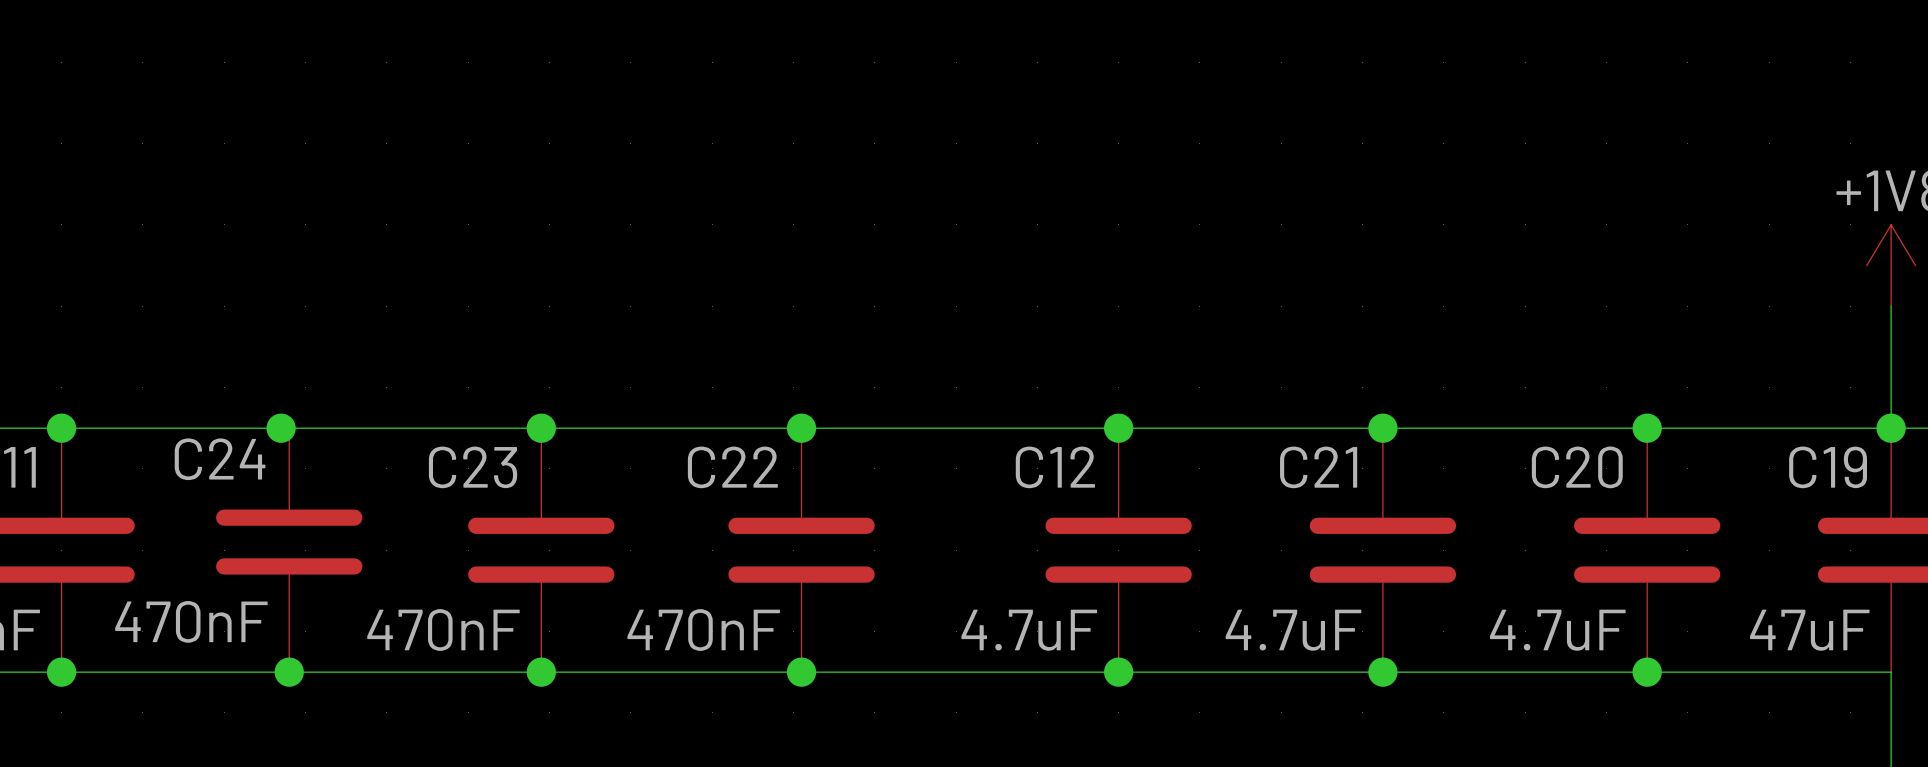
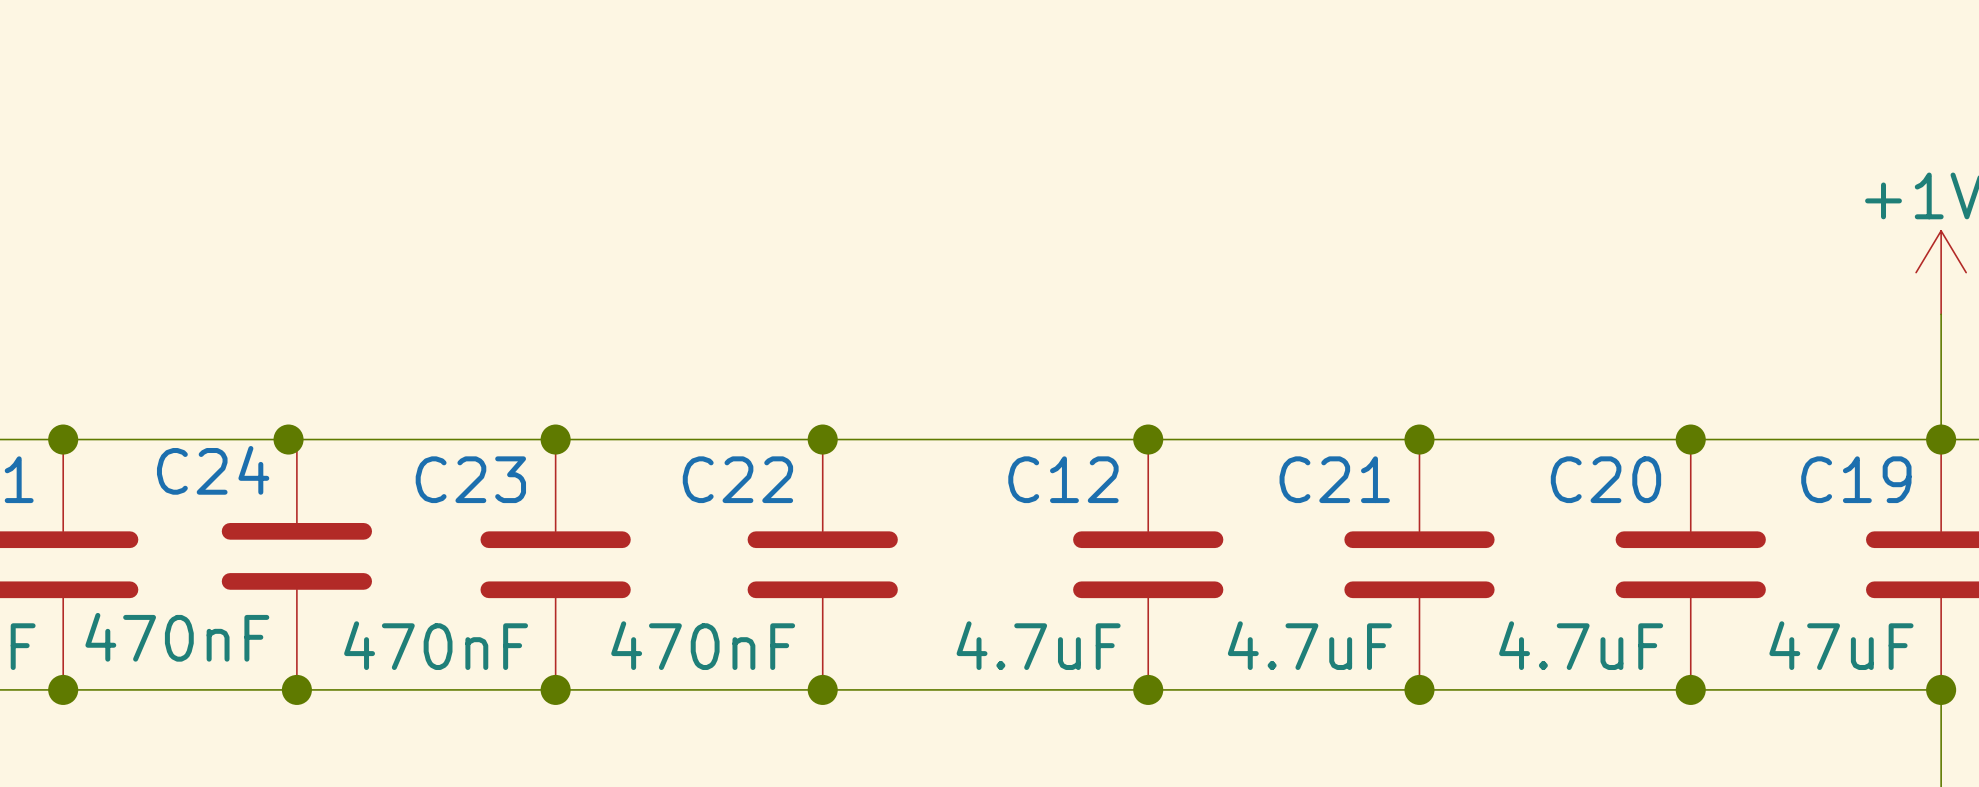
junction: none -> (1941, 689)

